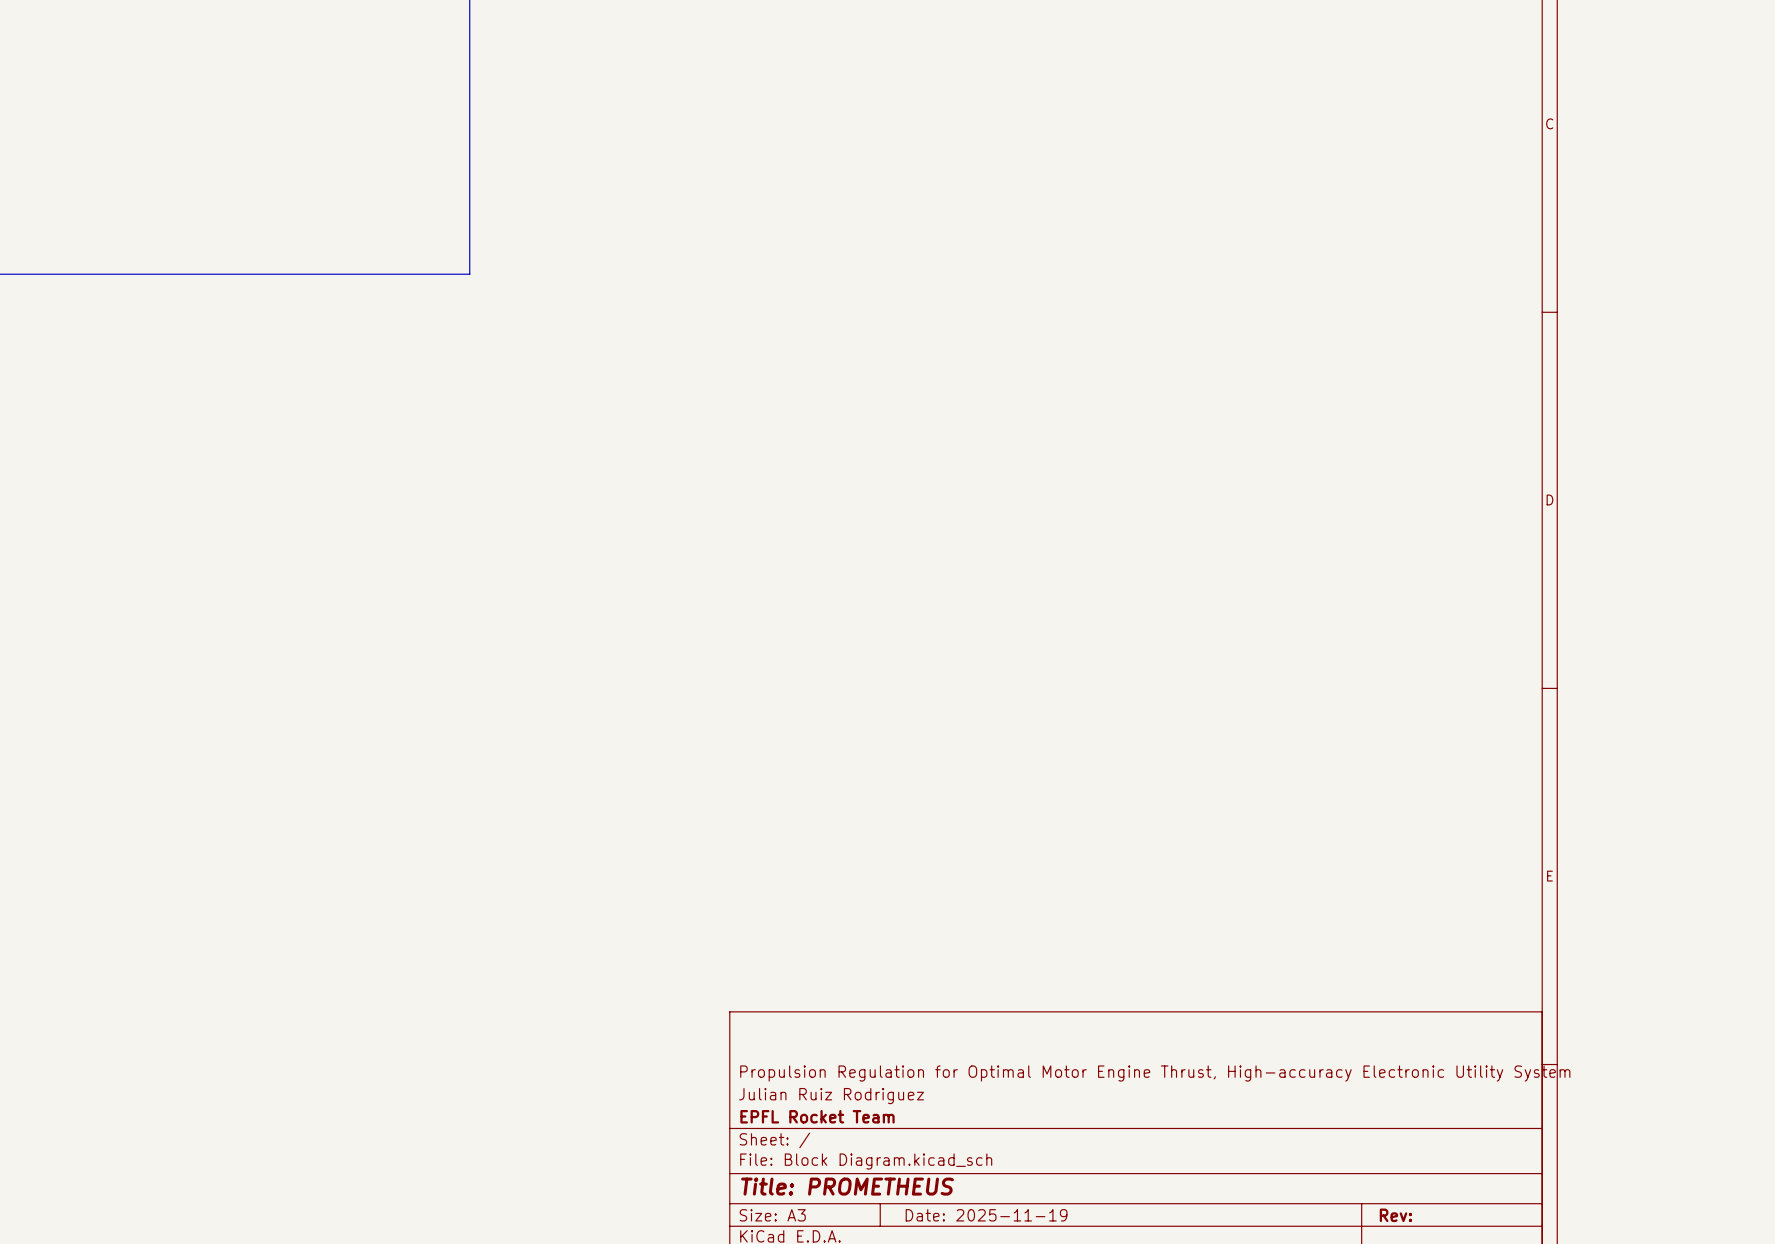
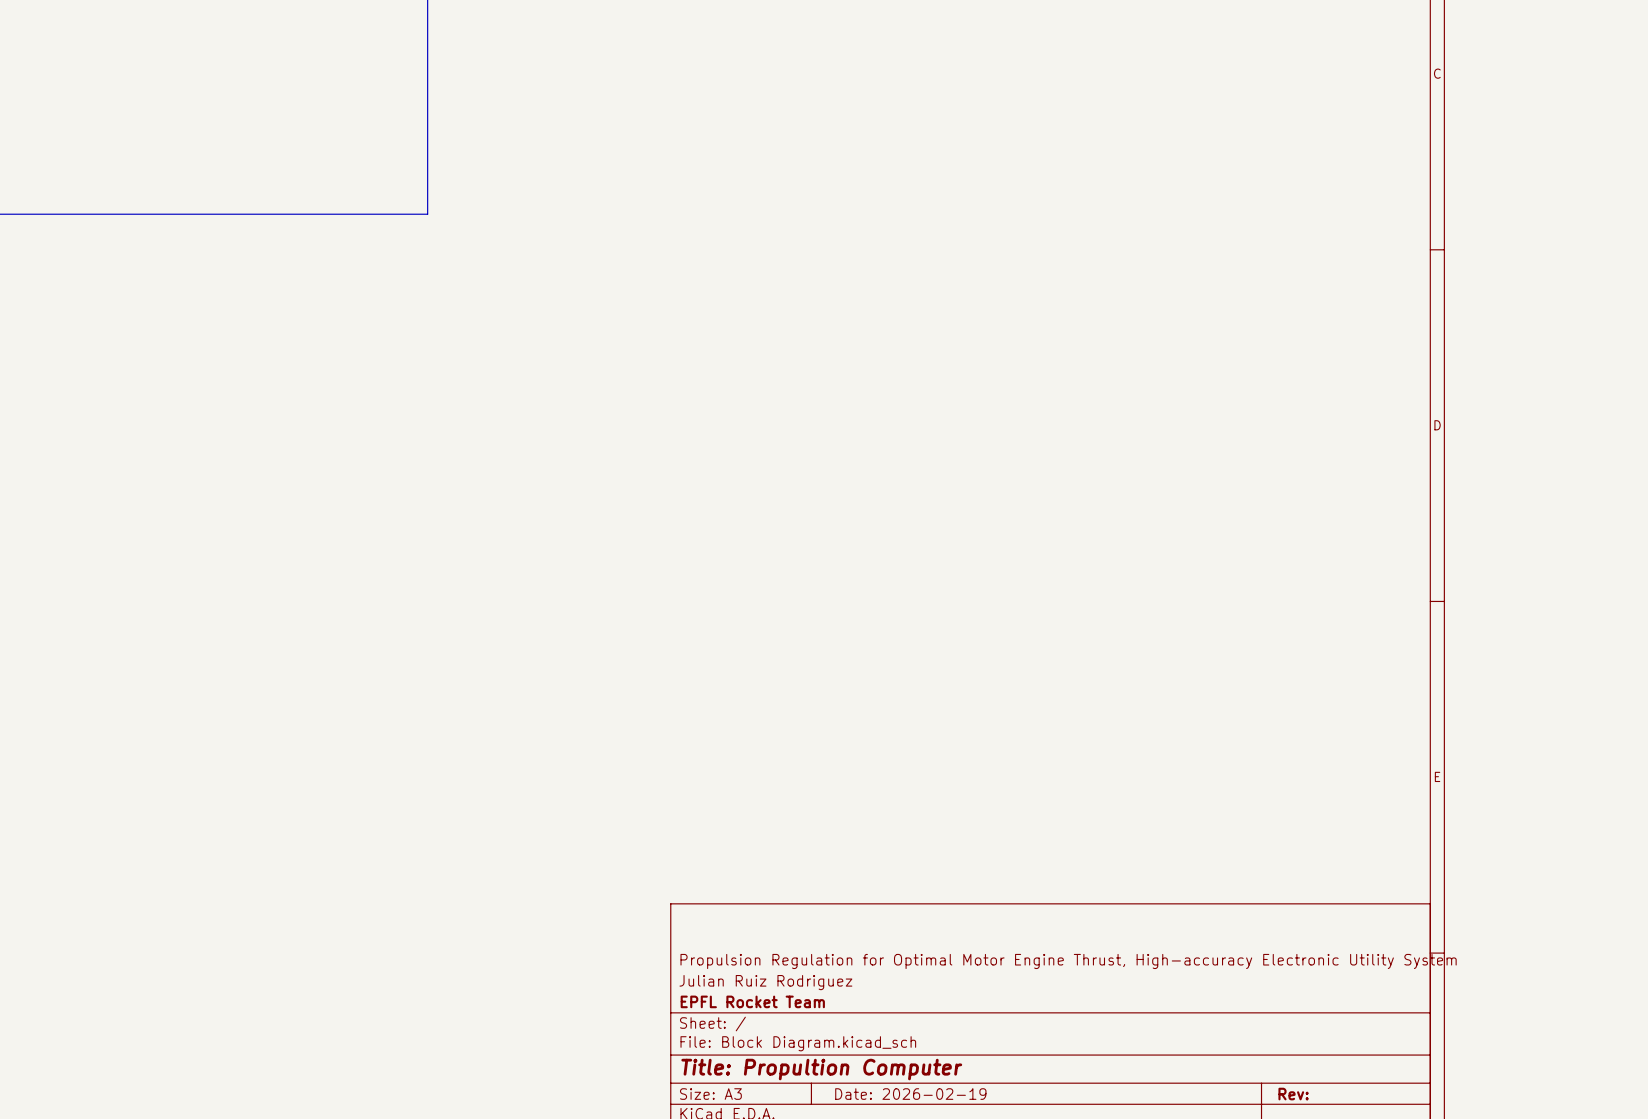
title block: Title: PROMETHEUS (847, 1186) -> Title: Propultion Computer (821, 1069)
title block: Date: 2025-11-19 (986, 1215) -> Date: 2026-02-19 (910, 1094)

